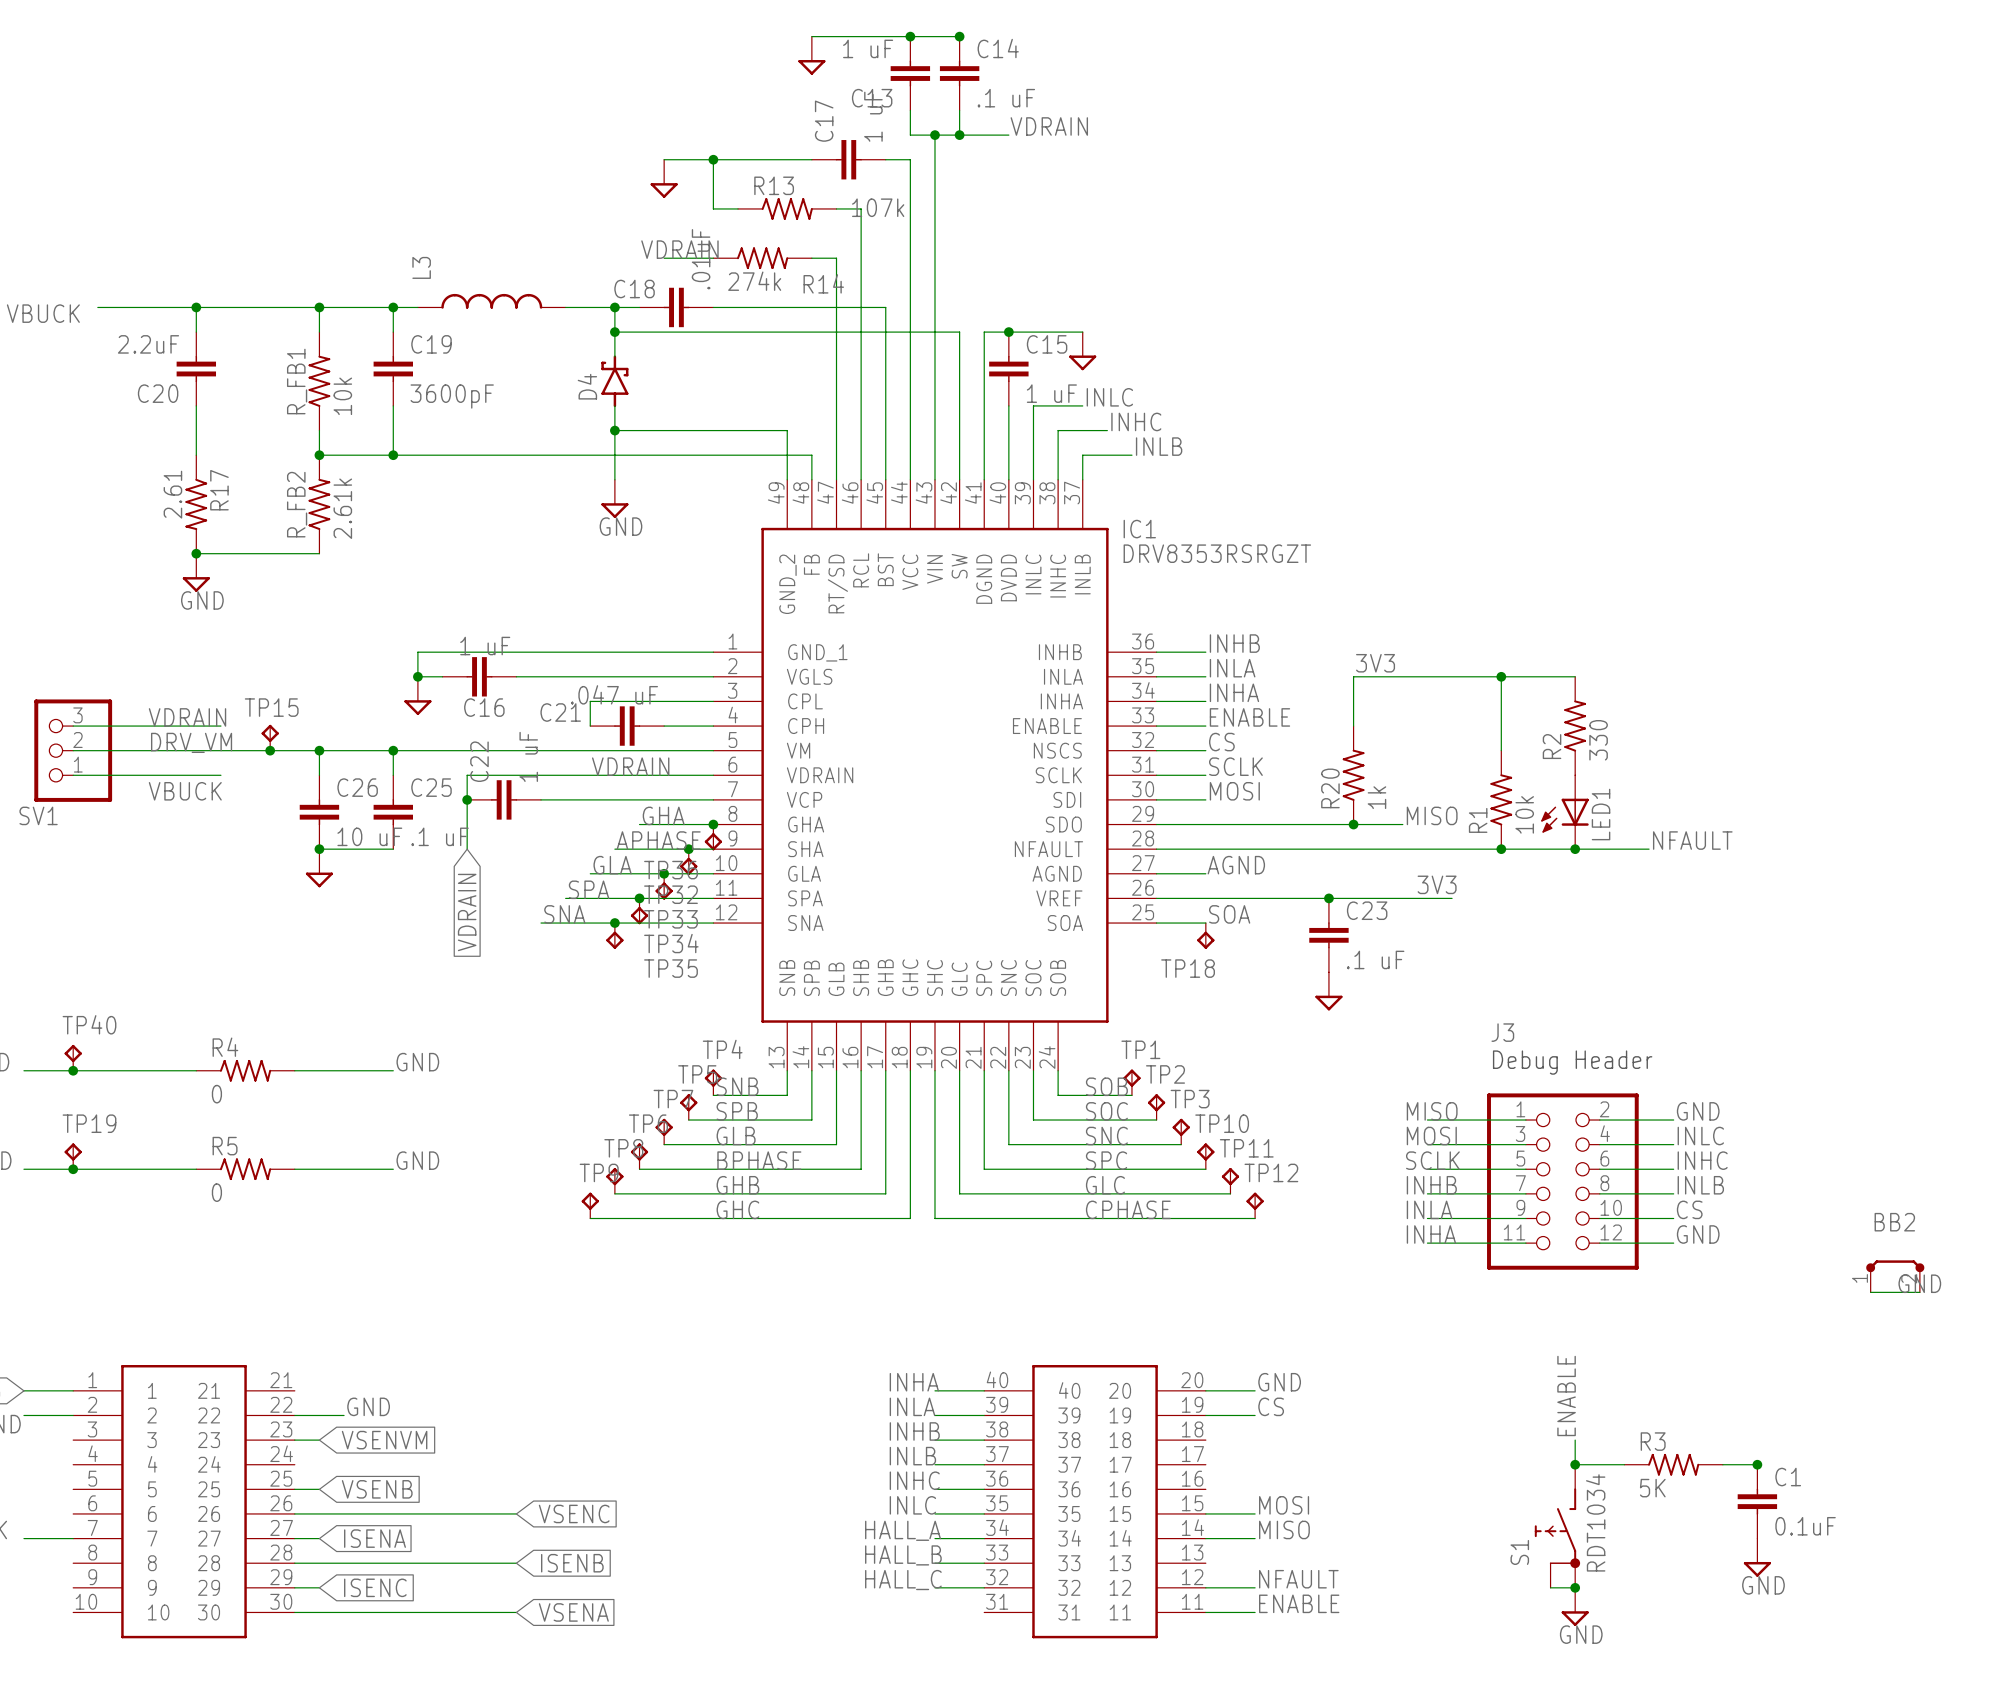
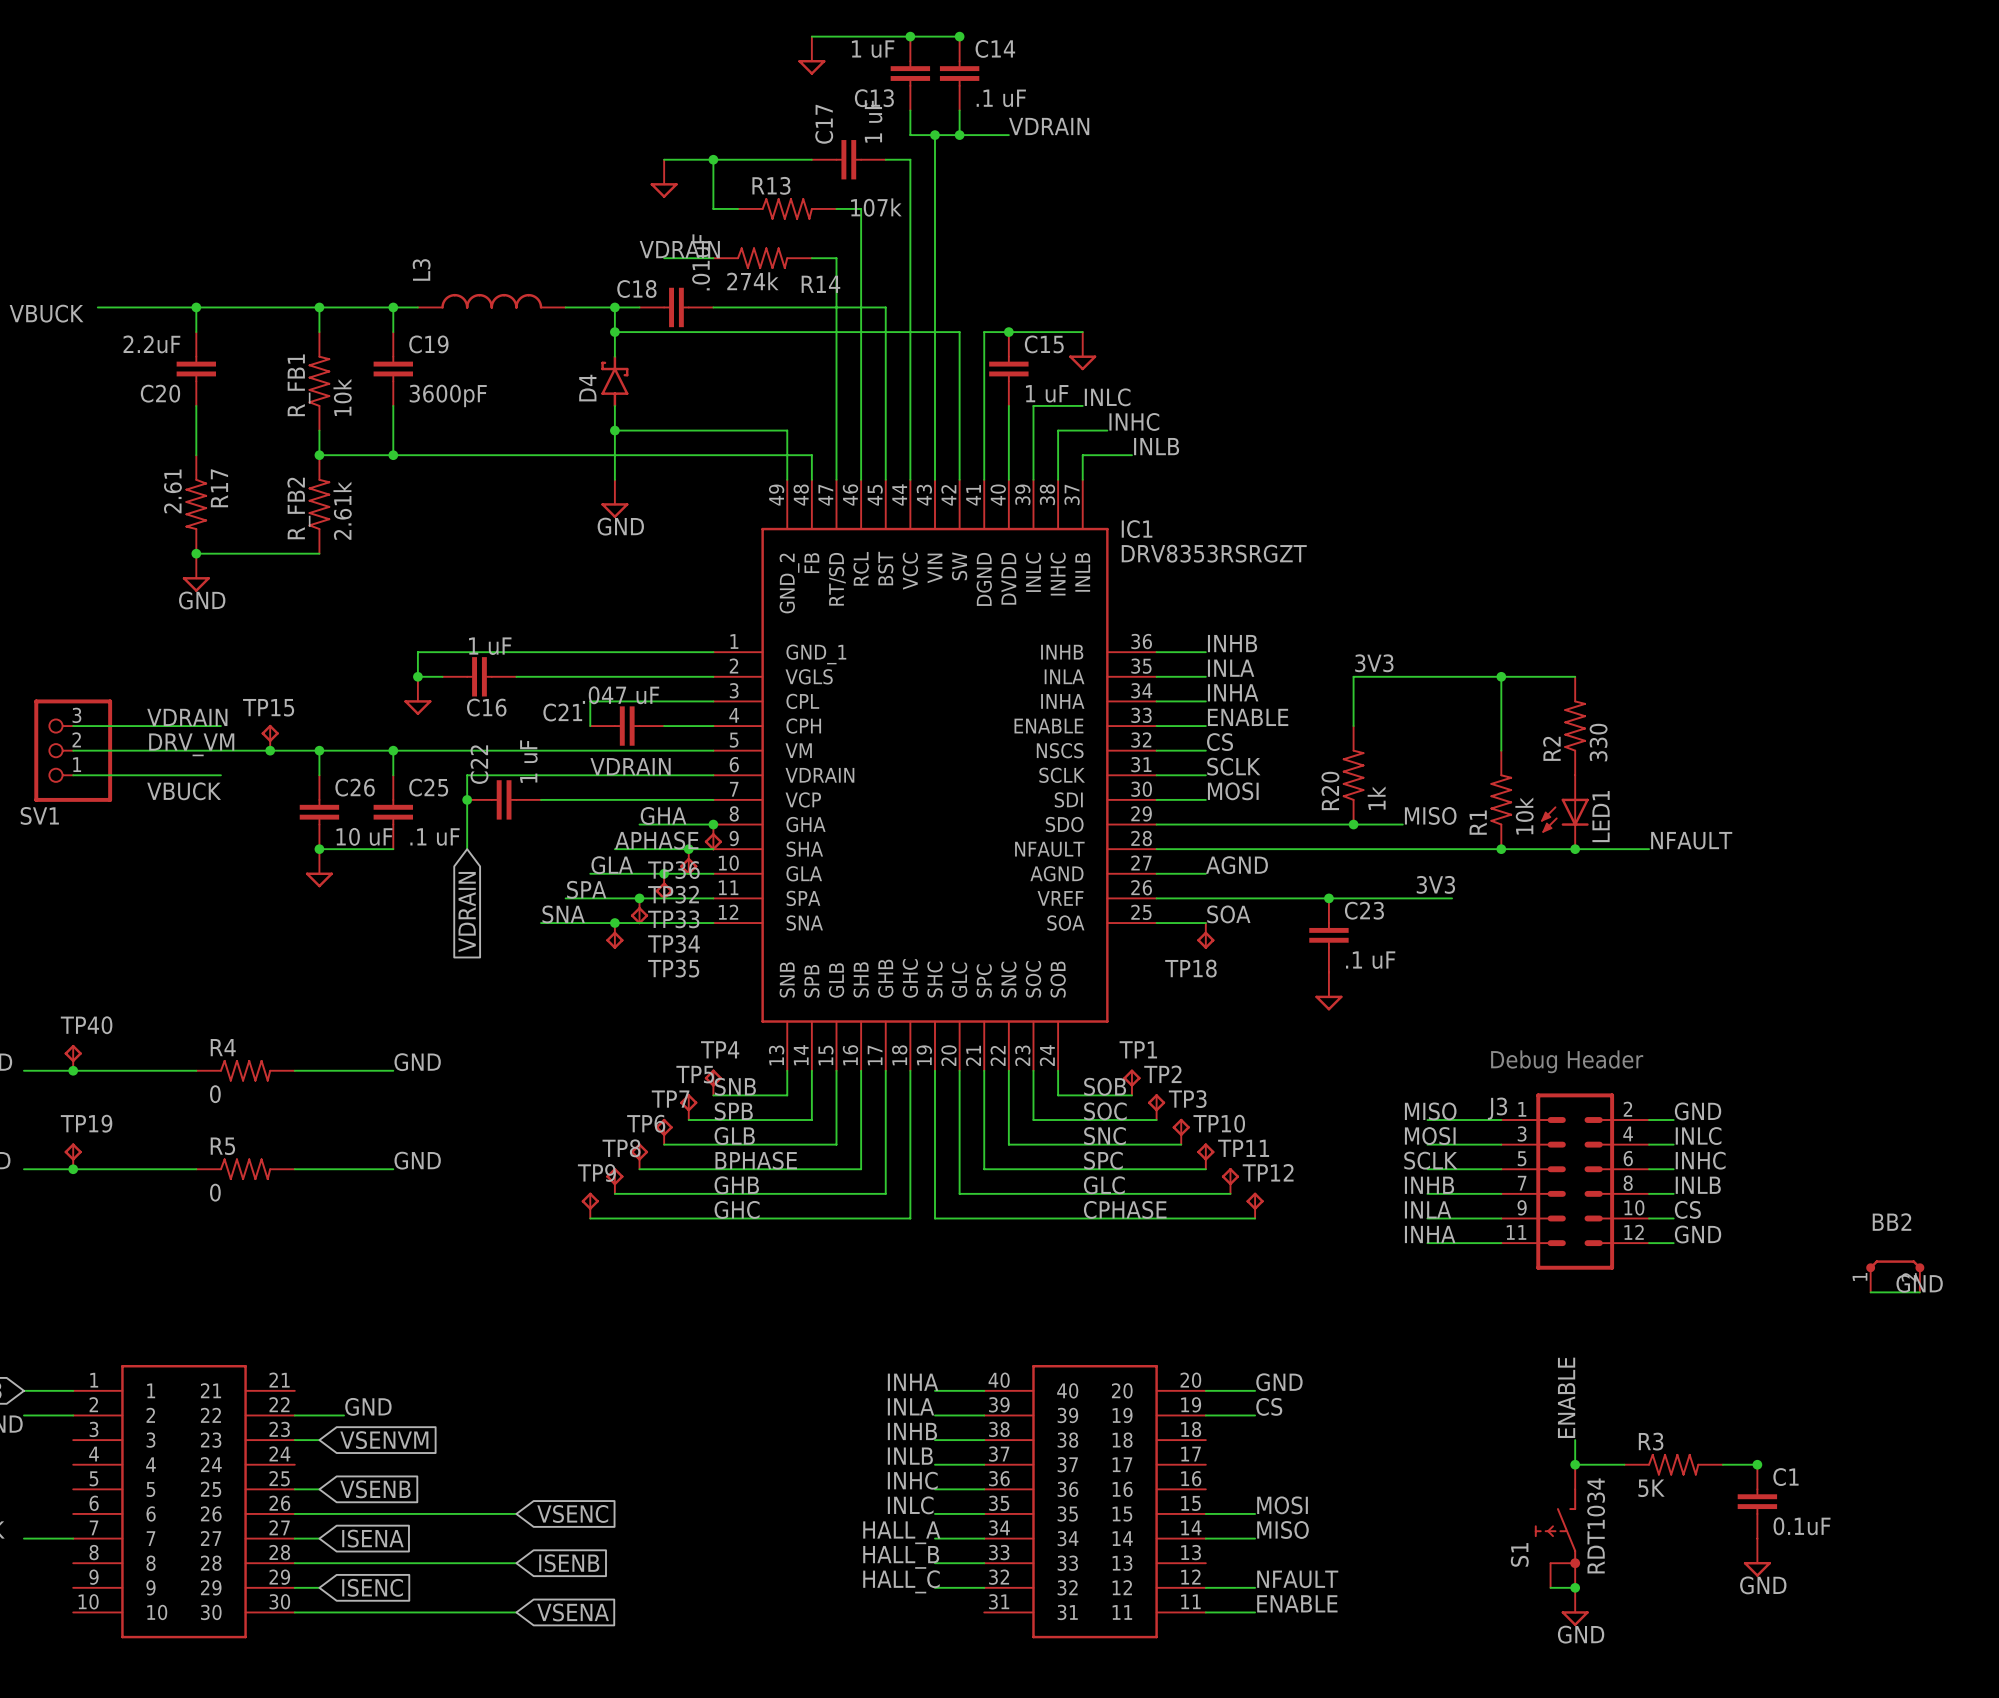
J3 name position: J3 (1502, 1032) -> J3 (1497, 1108)
J3 symbol: [1487, 1093, 1639, 1270] -> [1501, 1093, 1650, 1270]

